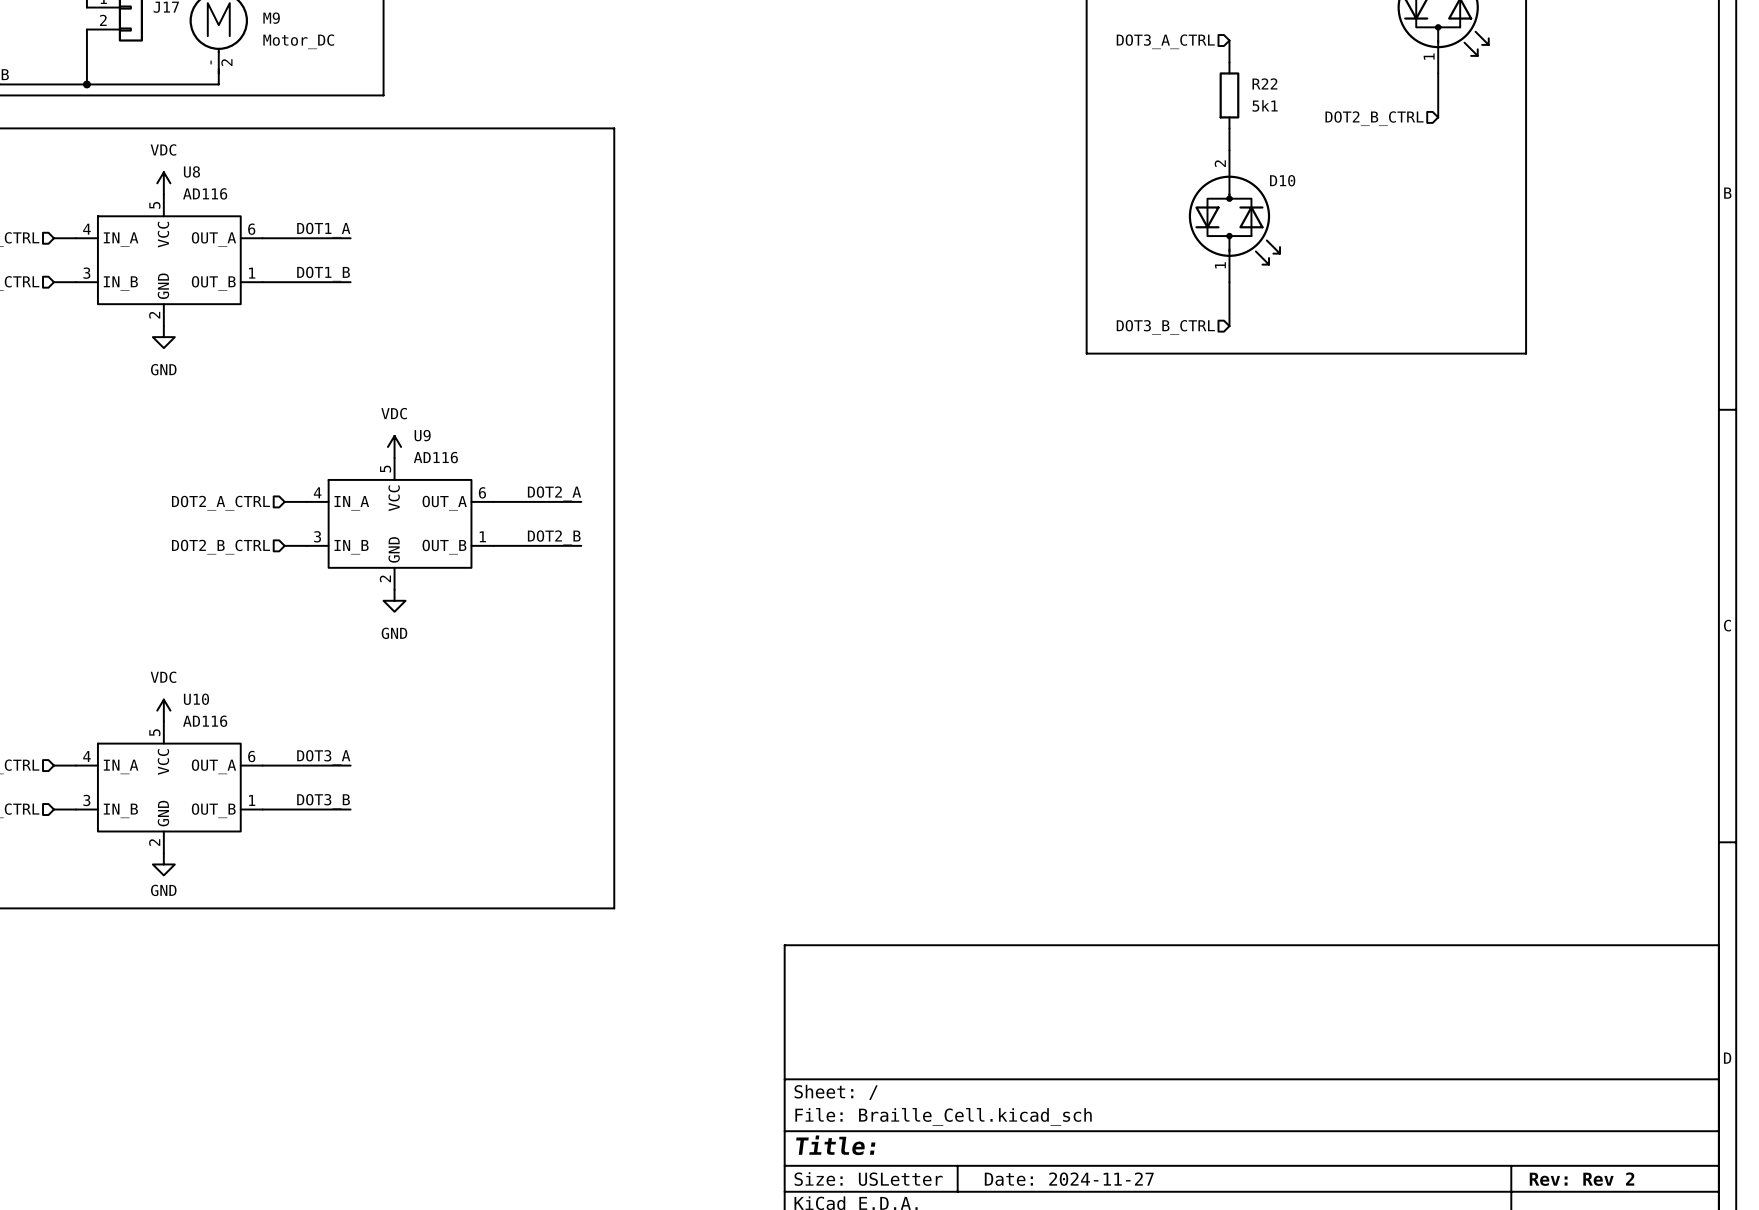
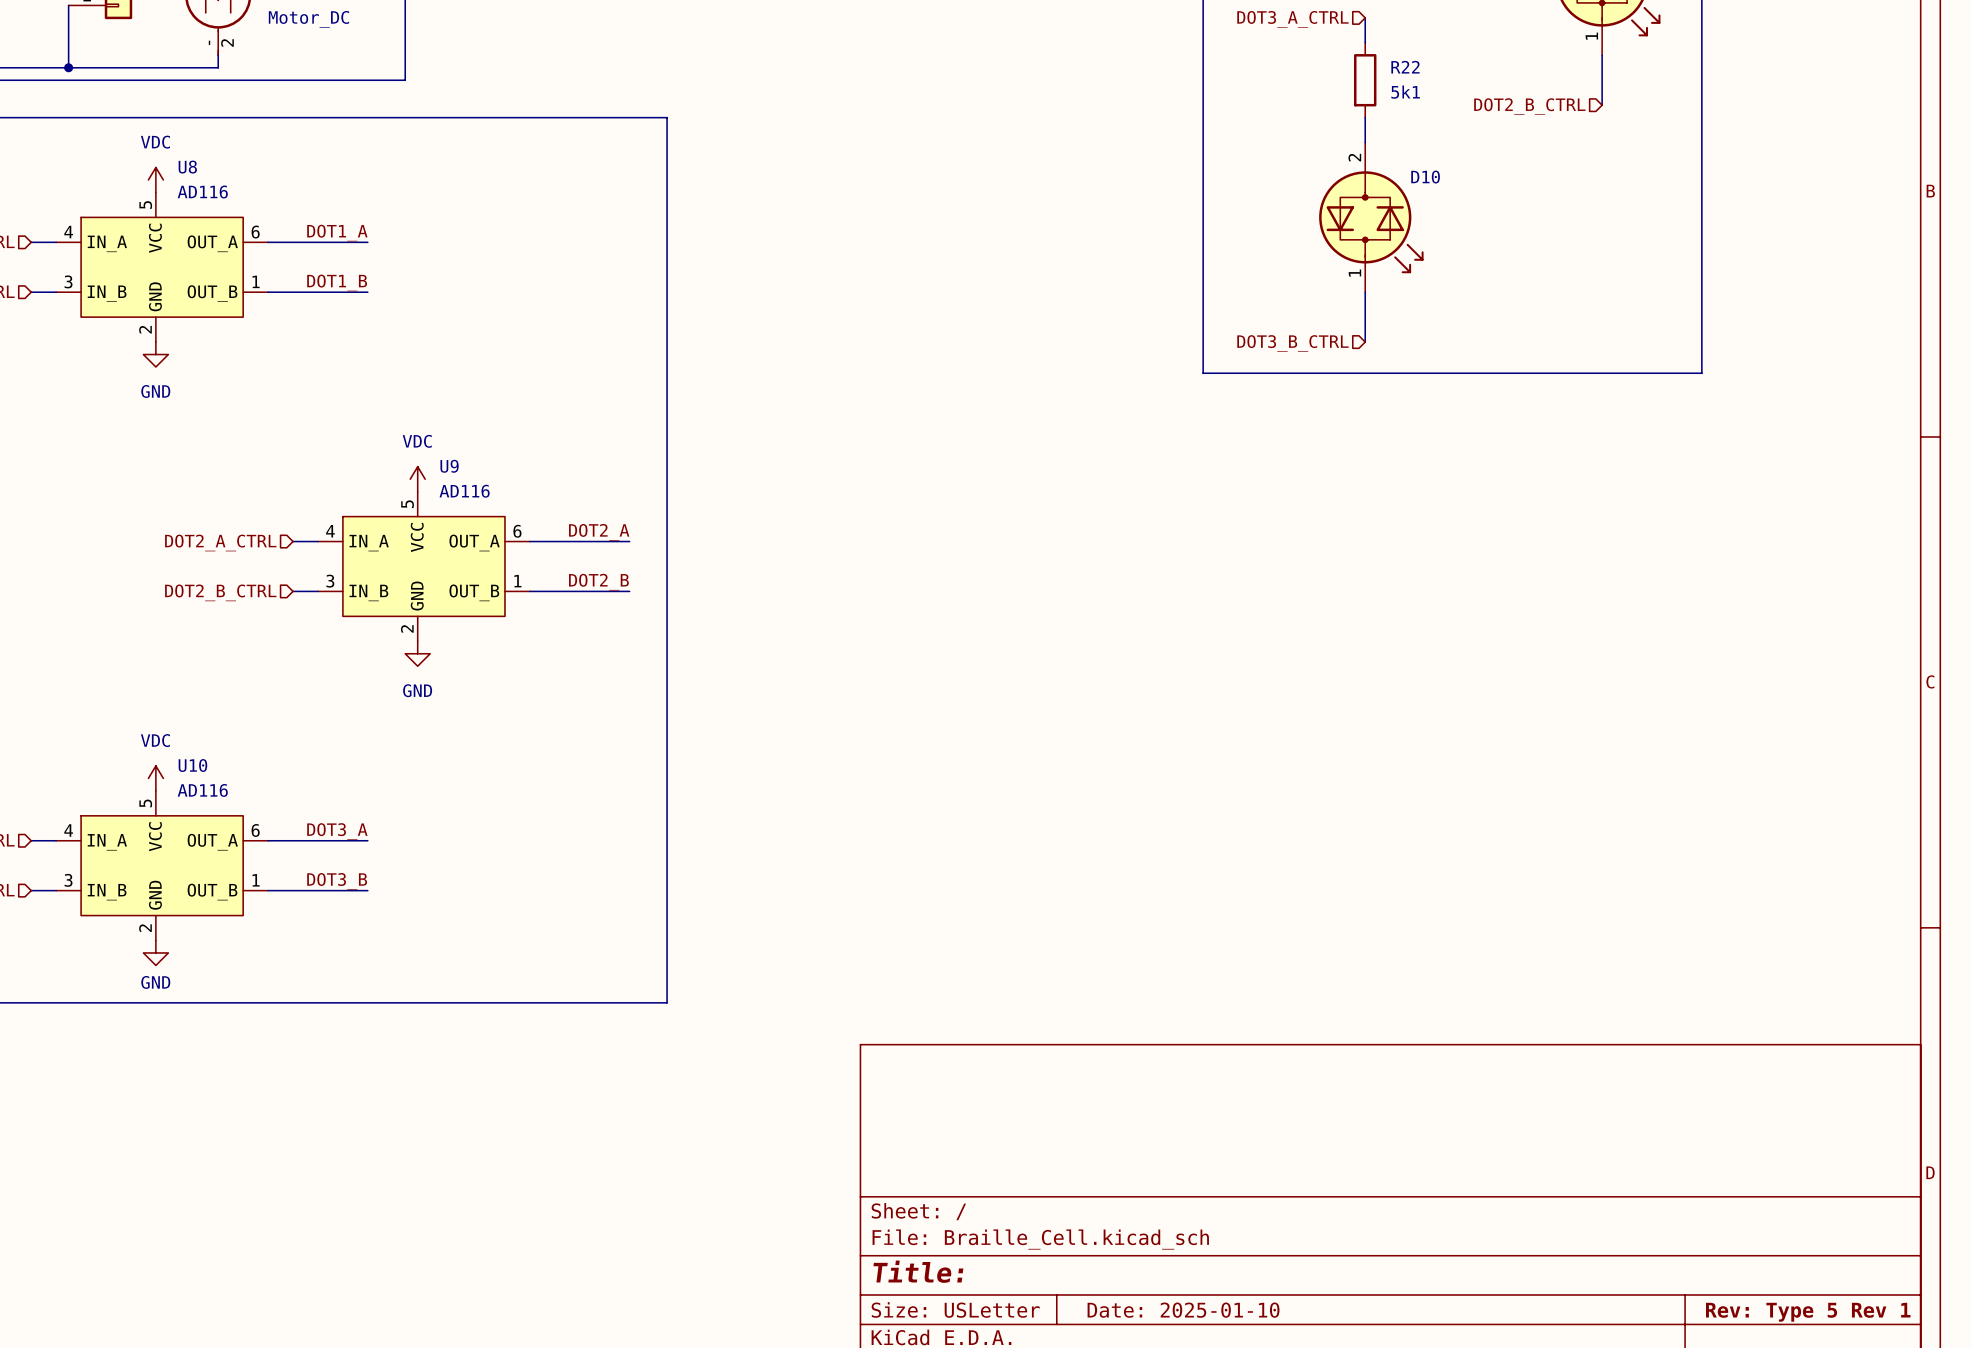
title block: Date: 2024-11-27 (1069, 1179) -> Date: 2025-01-10 (1183, 1310)
title block: Rev: Rev 2 (1582, 1179) -> Rev: Type 5 Rev 1 (1808, 1312)

